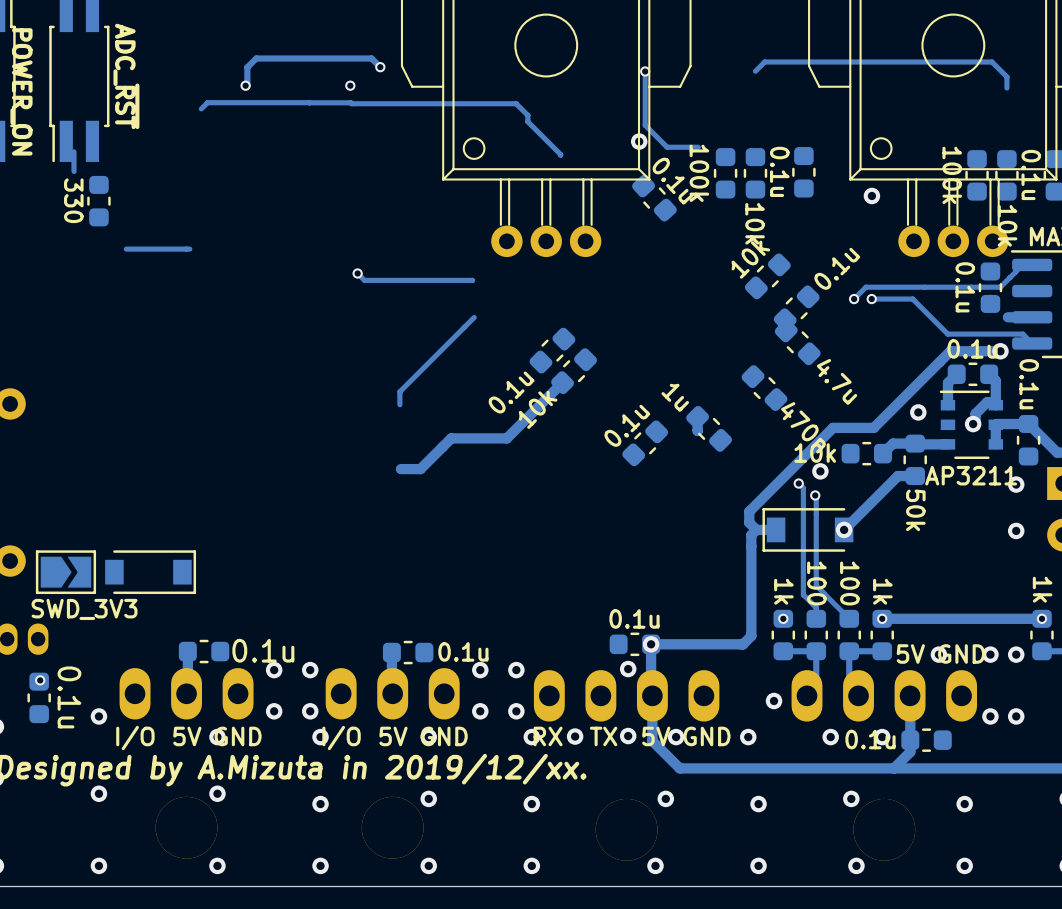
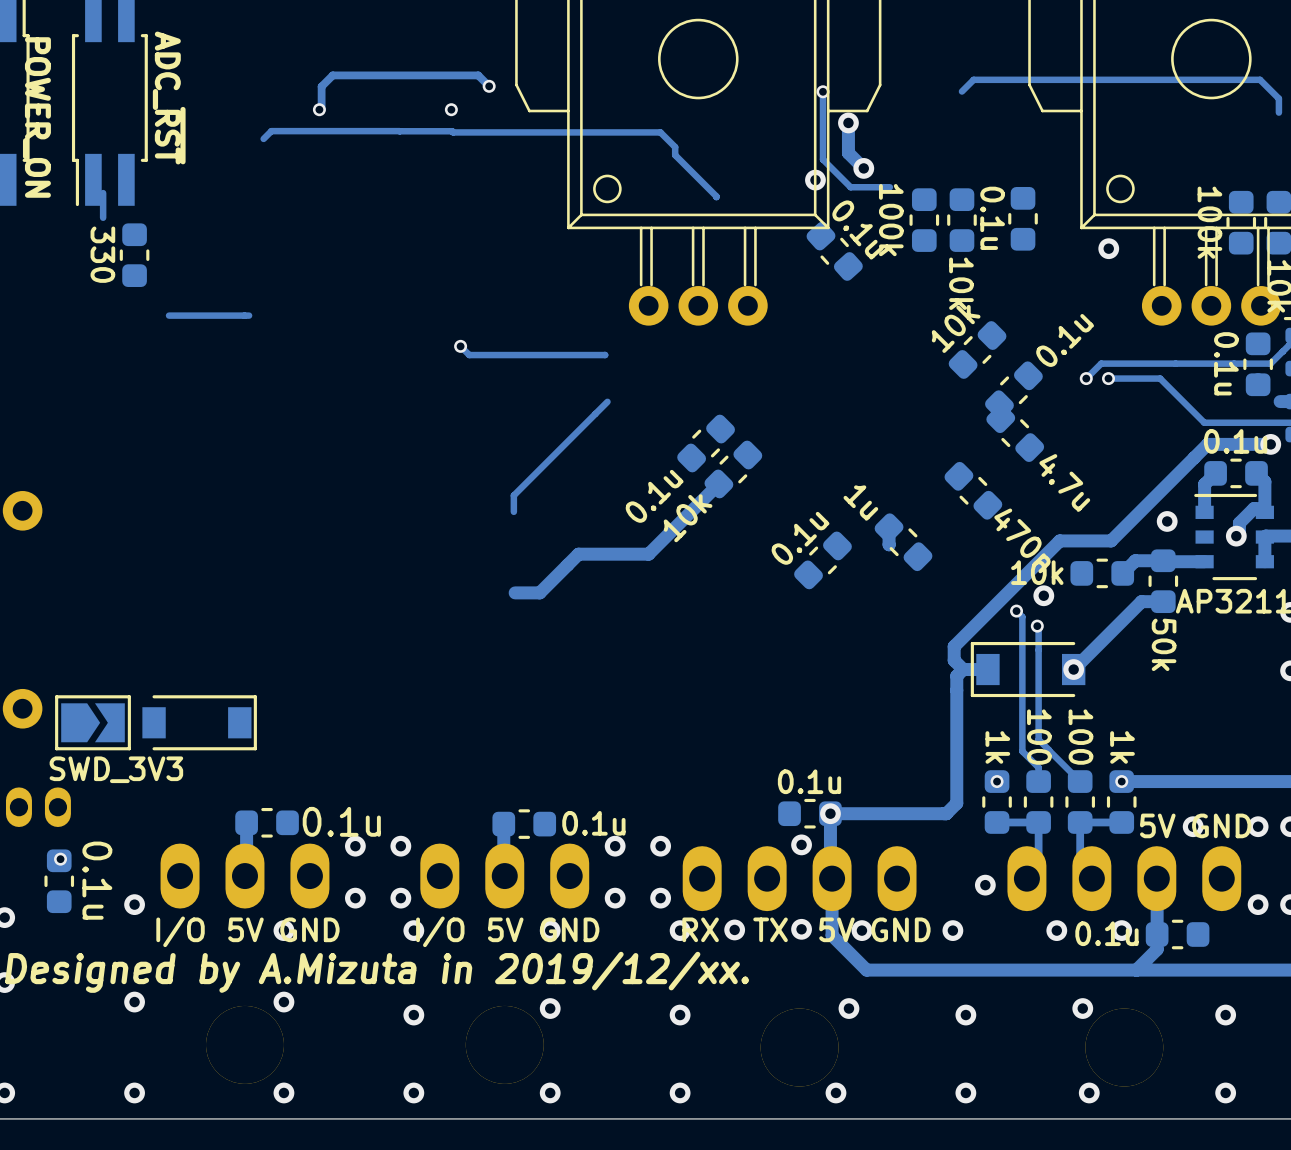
track: none -> (848, 122) (848, 153) (863, 168)
via: none -> (848, 122)
via: none -> (863, 168)

